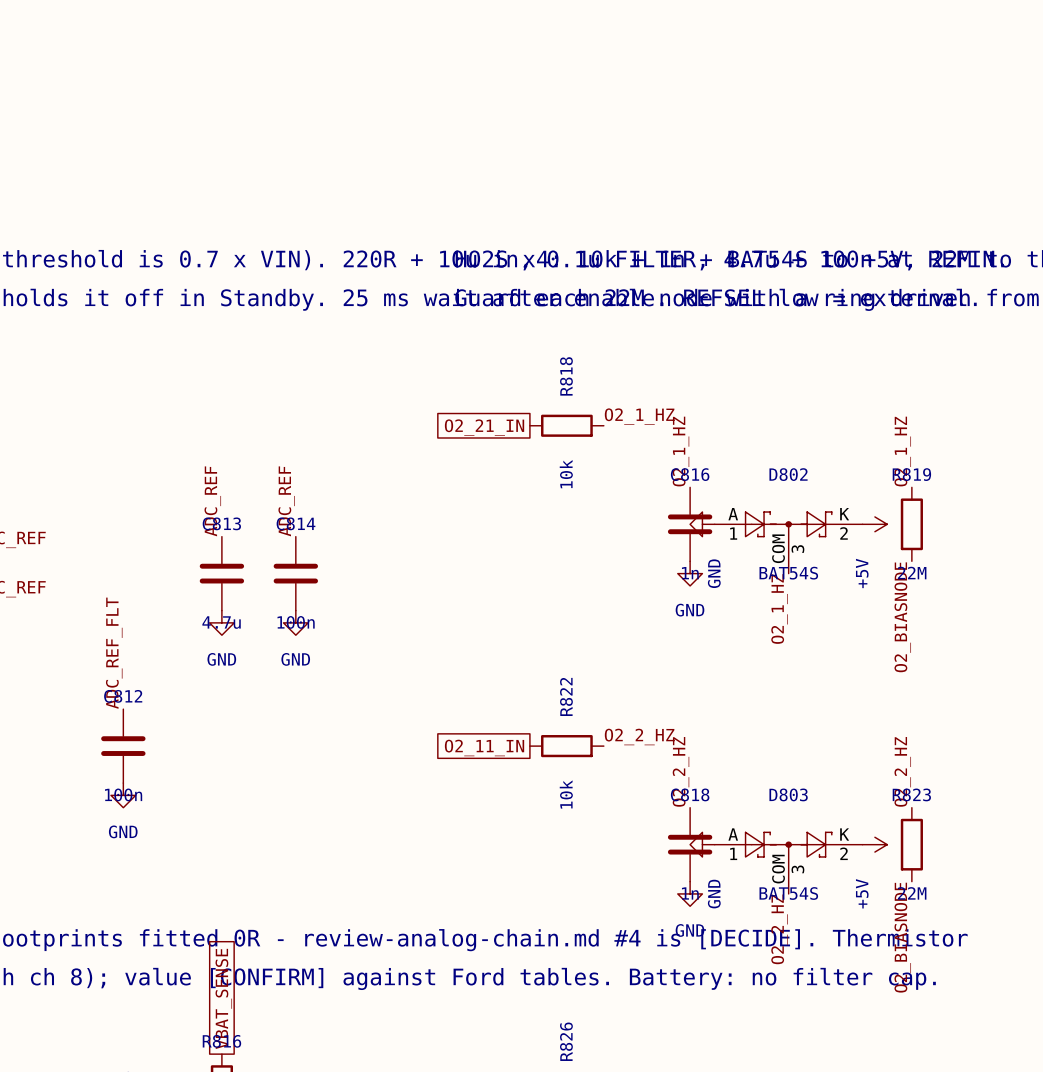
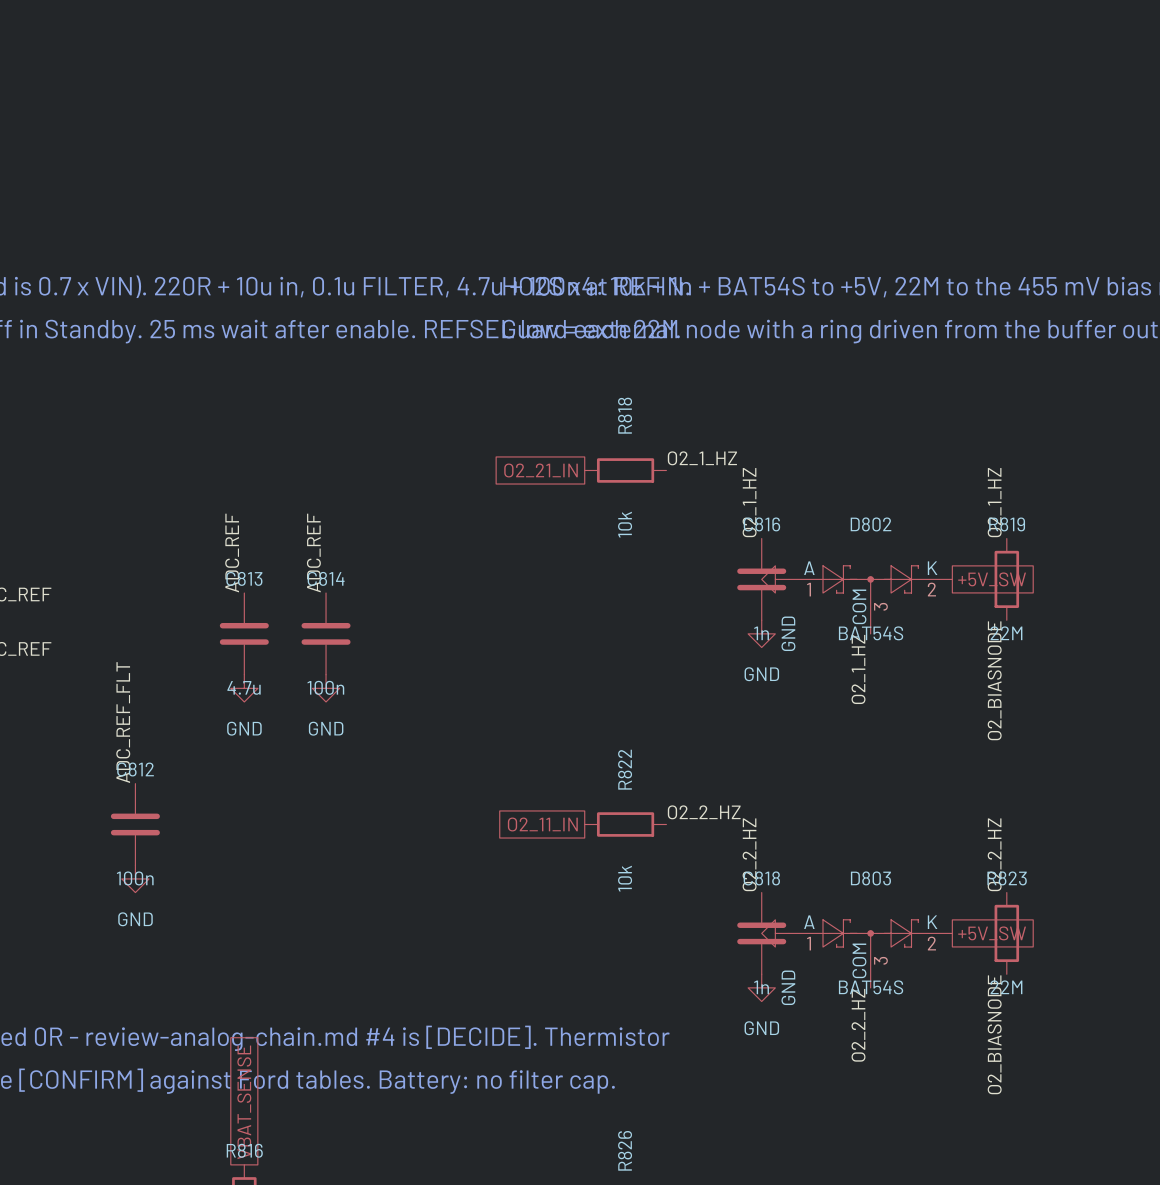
power symbol: +5V (874, 524) -> none
global label: none -> +5V_SW (992, 579)
power symbol: +5V (874, 844) -> none
global label: none -> +5V_SW (992, 933)

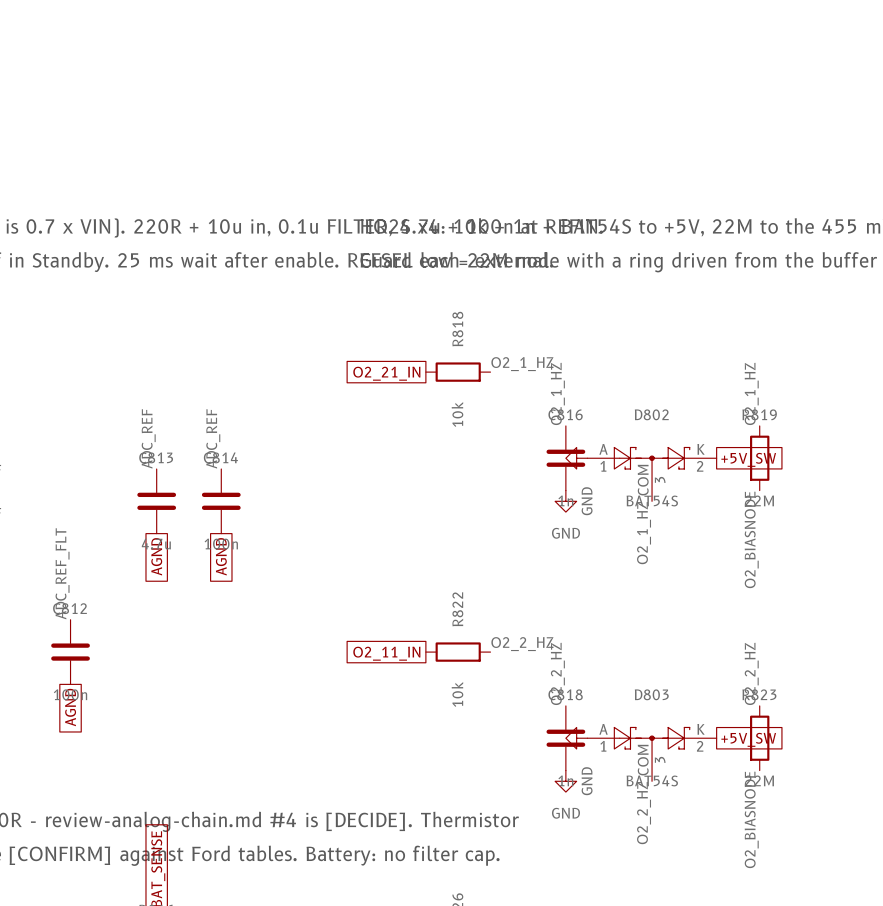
power symbol: GND (244, 688) -> none
power symbol: GND (326, 688) -> none
global label: none -> AGND (156, 556)
global label: none -> AGND (221, 556)
power symbol: GND (135, 878) -> none
global label: none -> AGND (70, 707)

